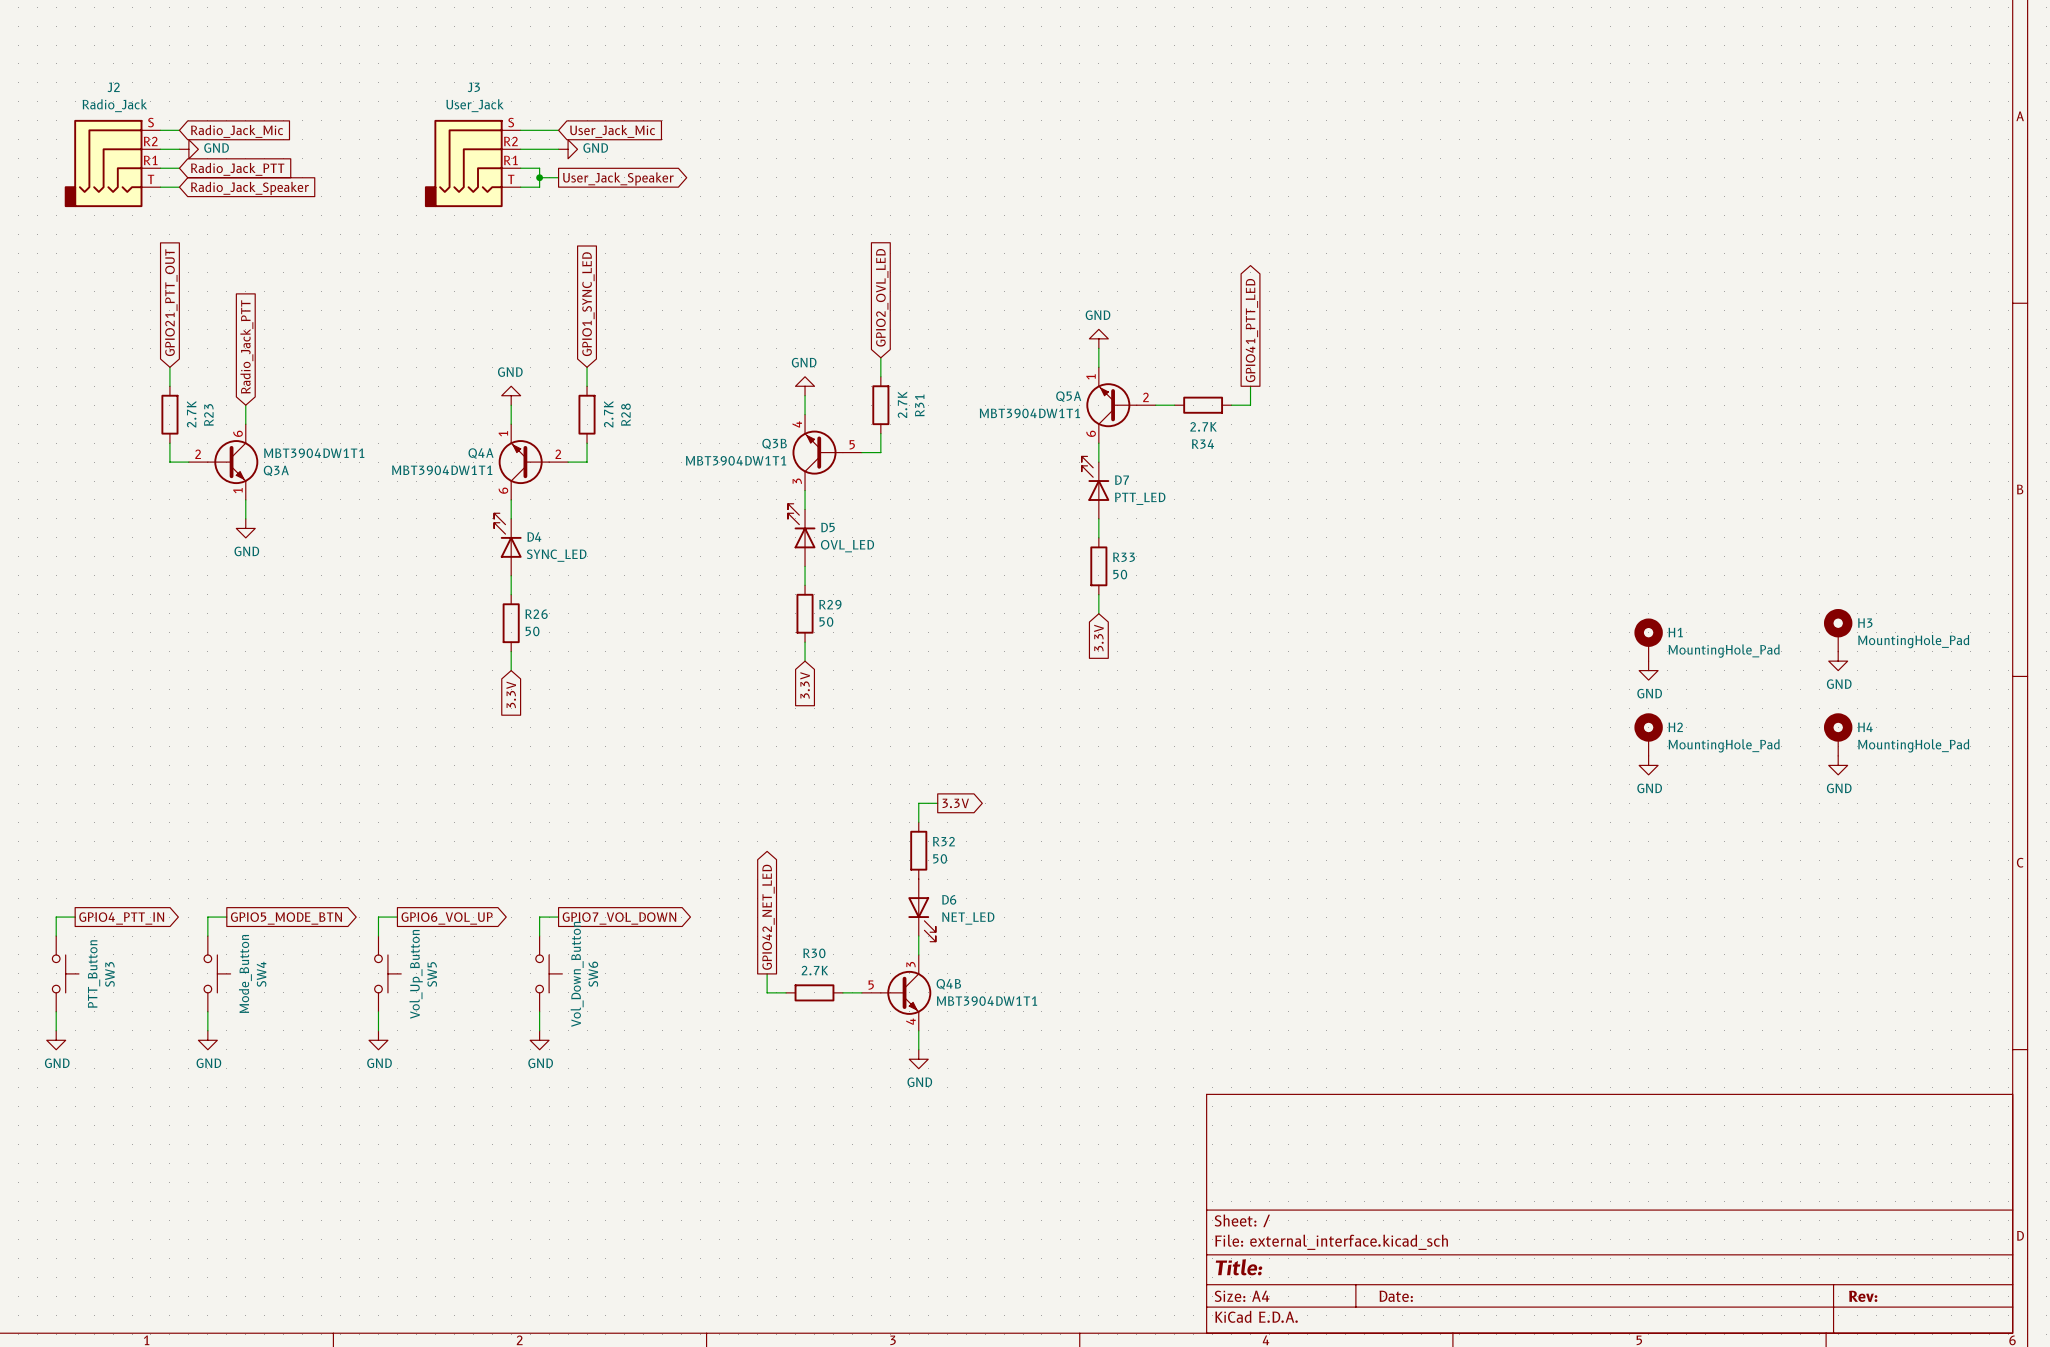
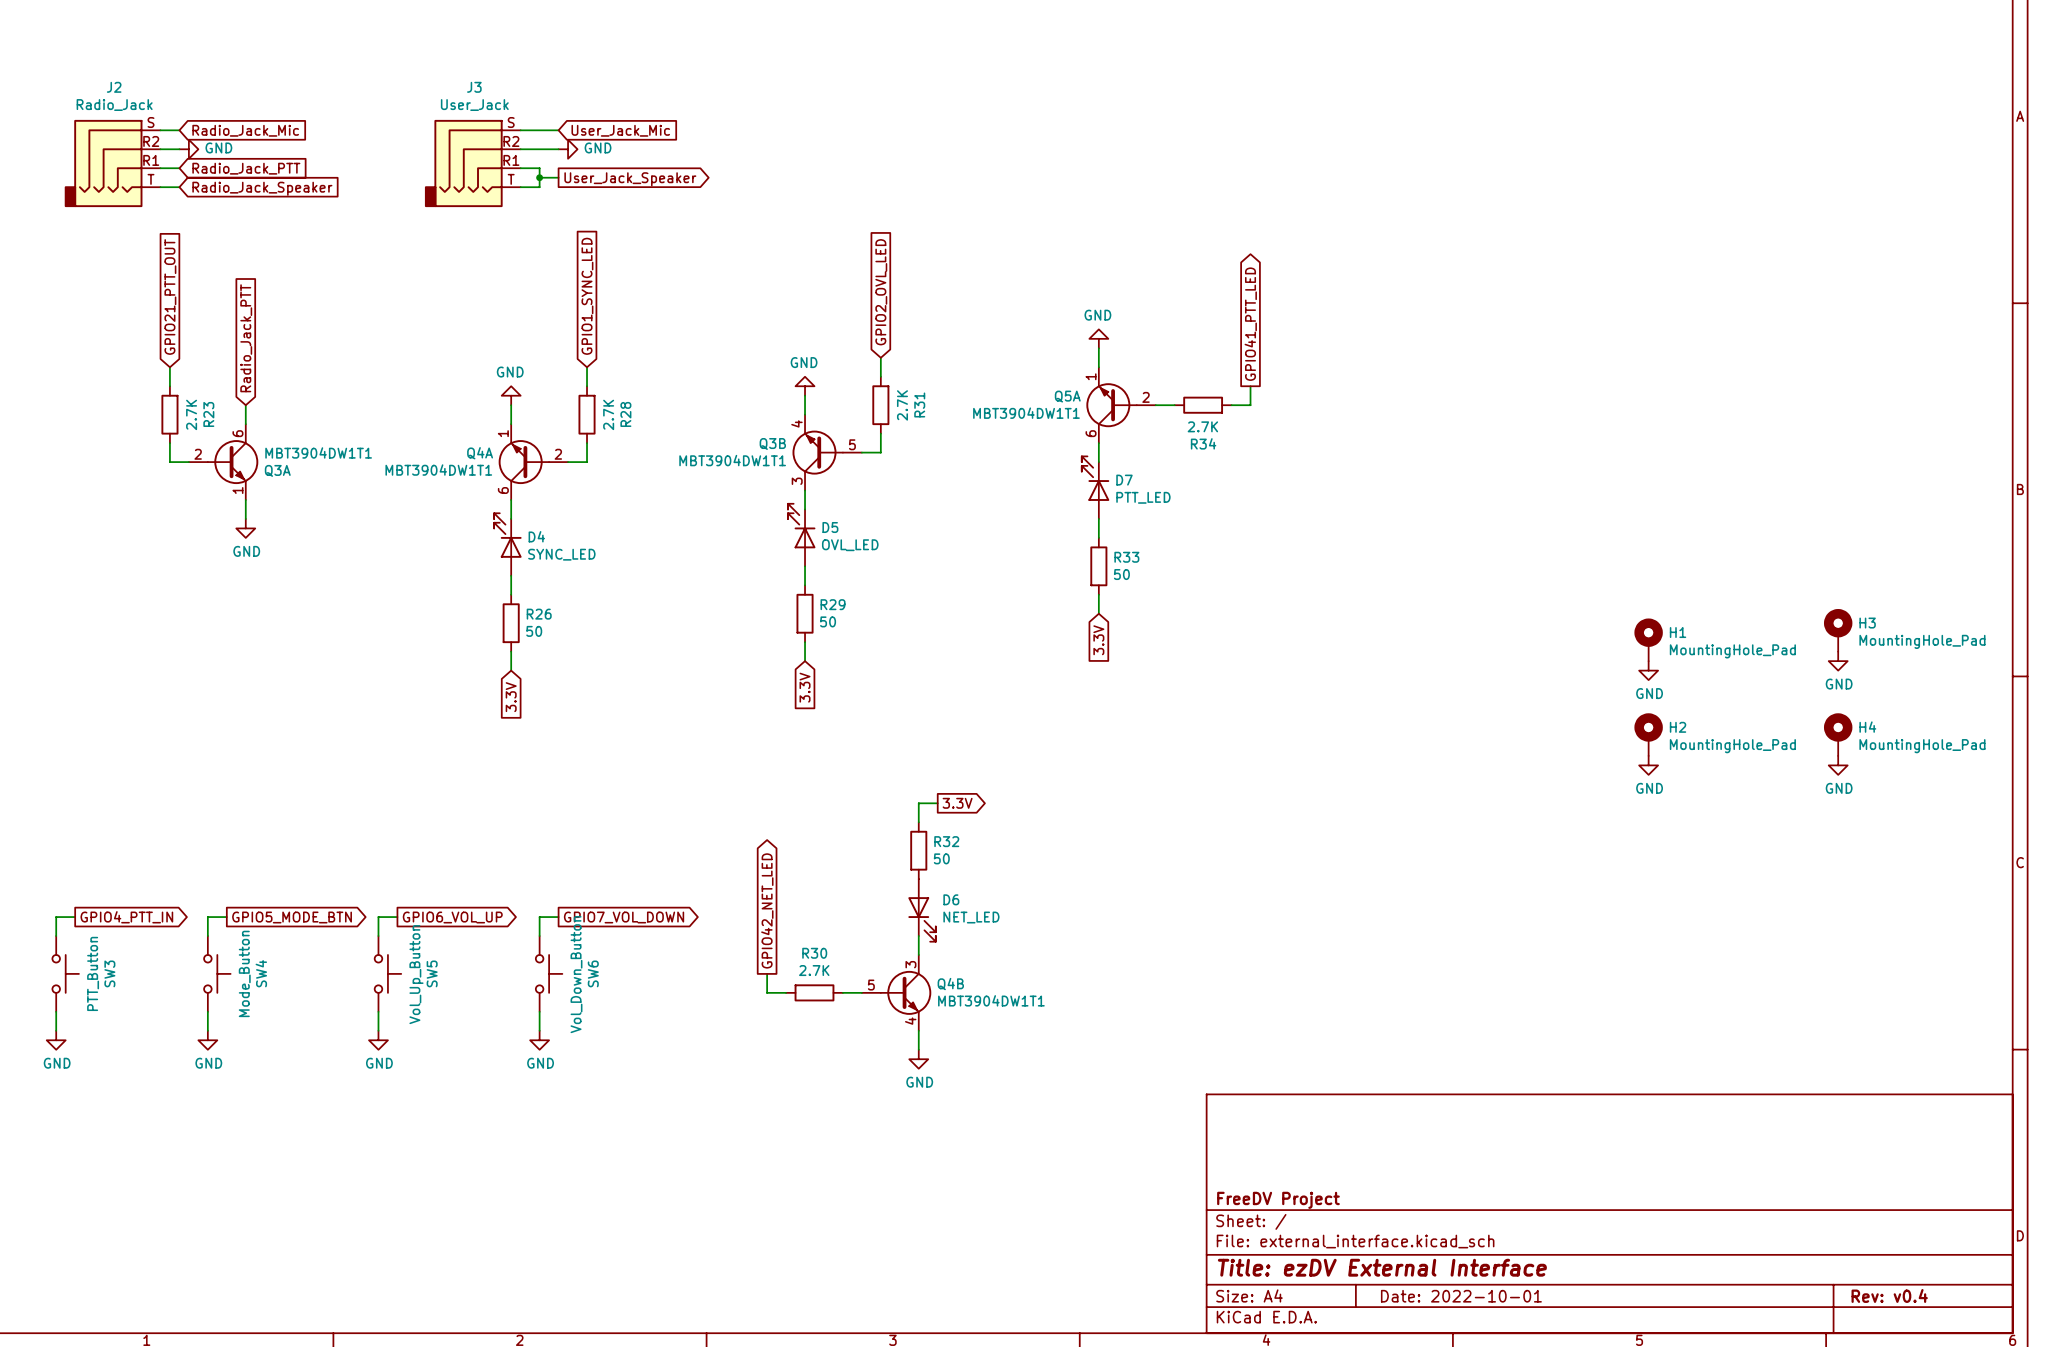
title block: none -> FreeDV Project (1278, 1200)
title block: Title: (1239, 1267) -> Title: ezDV External Interface (1382, 1267)
title block: Date: (1396, 1296) -> Date: 2022-10-01 (1461, 1296)
title block: Rev: (1863, 1296) -> Rev: v0.4 (1889, 1295)

